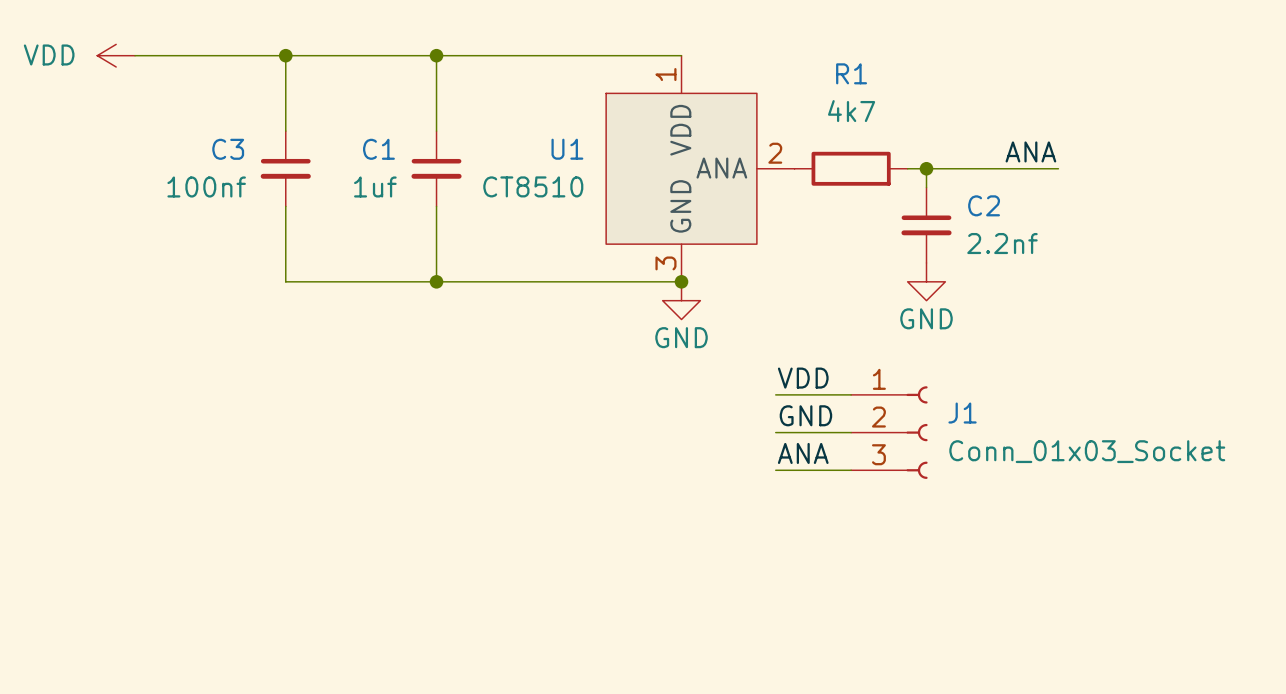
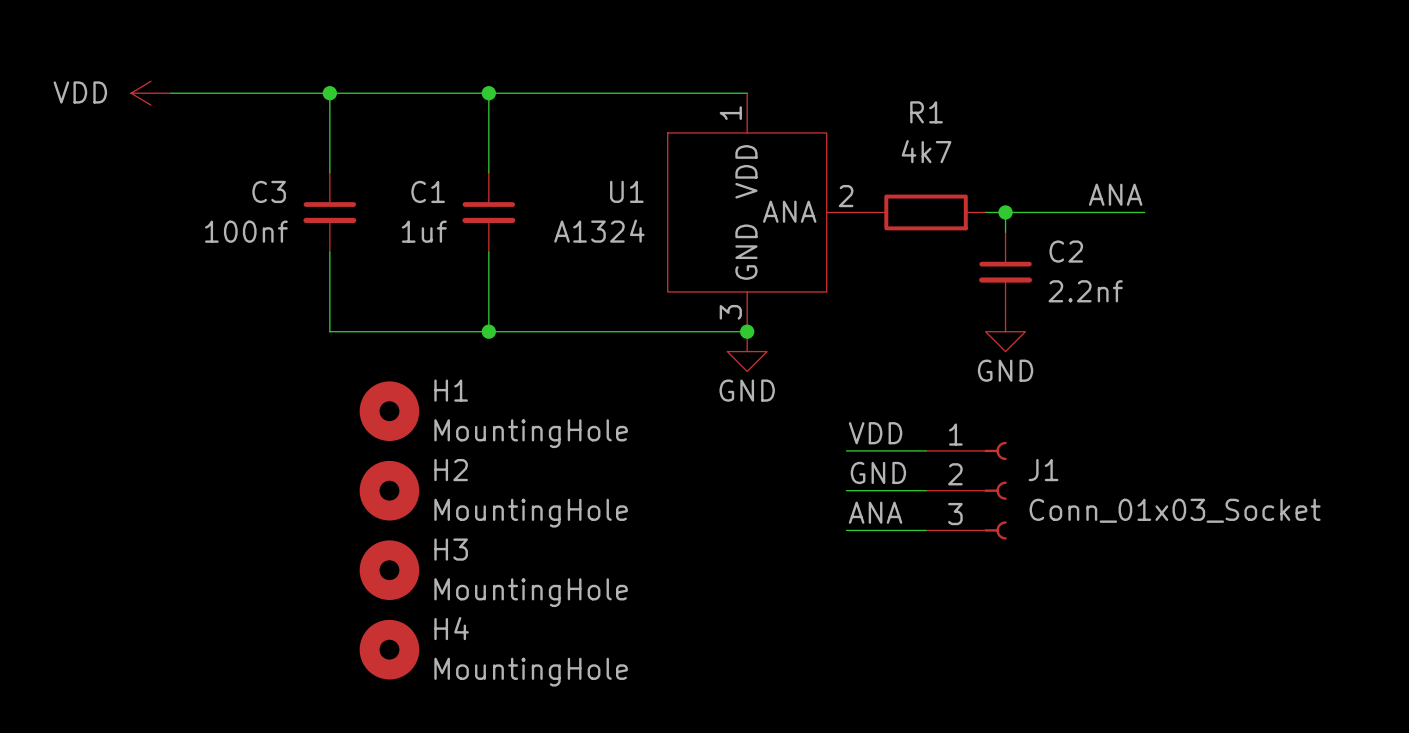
U1 value: CT8510 (533, 186) -> A1324 (599, 231)
H1: none -> MountingHole (389, 411)
H2: none -> MountingHole (389, 490)
H3: none -> MountingHole (389, 570)
H4: none -> MountingHole (389, 649)

